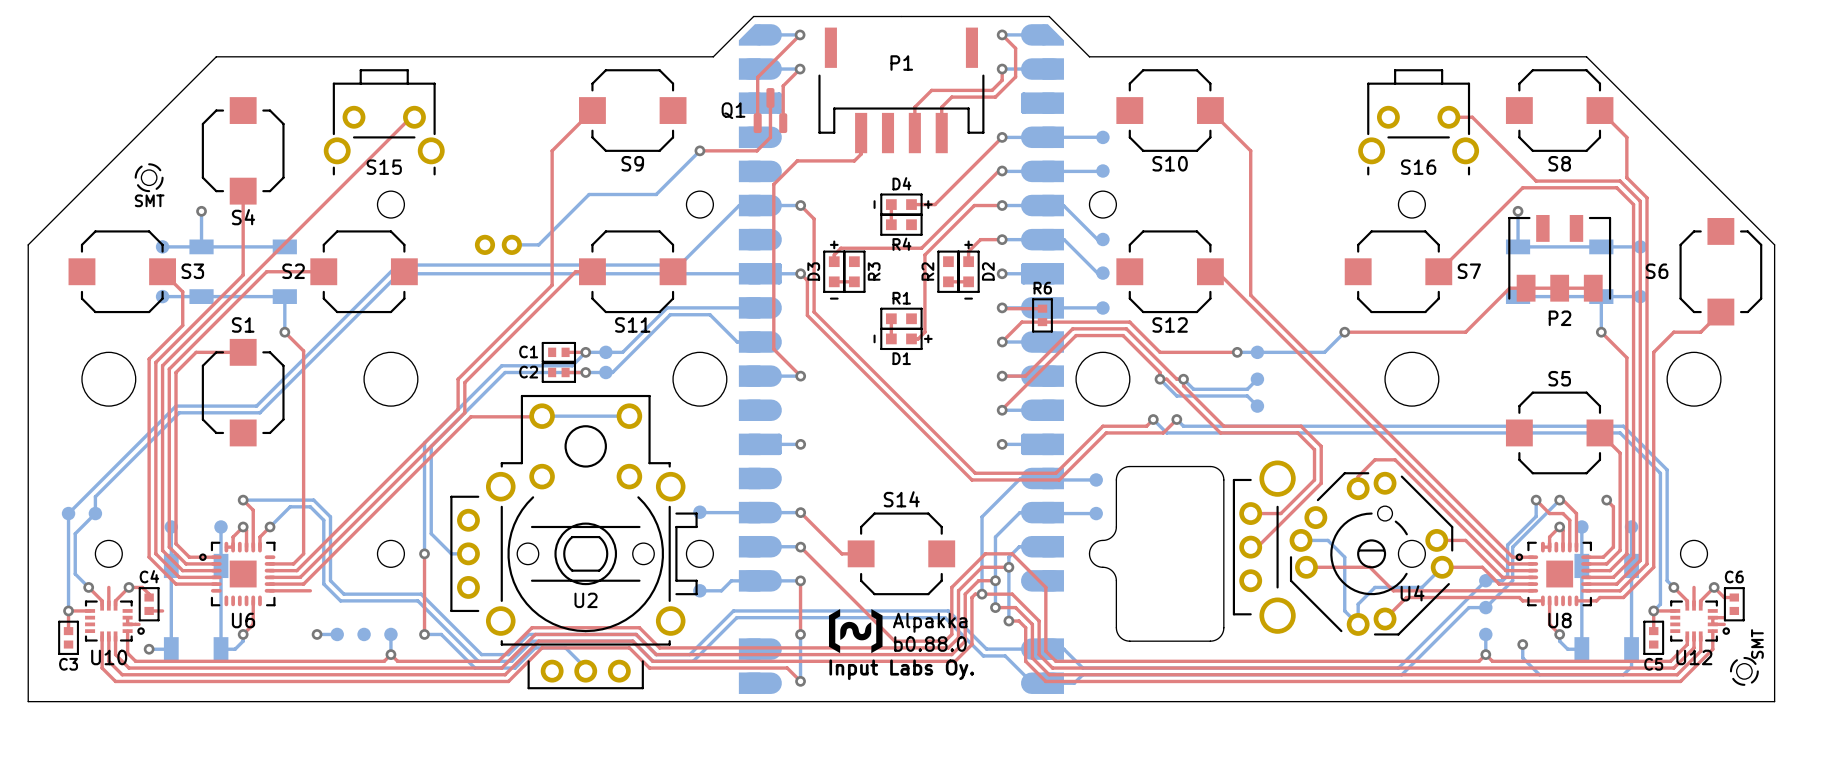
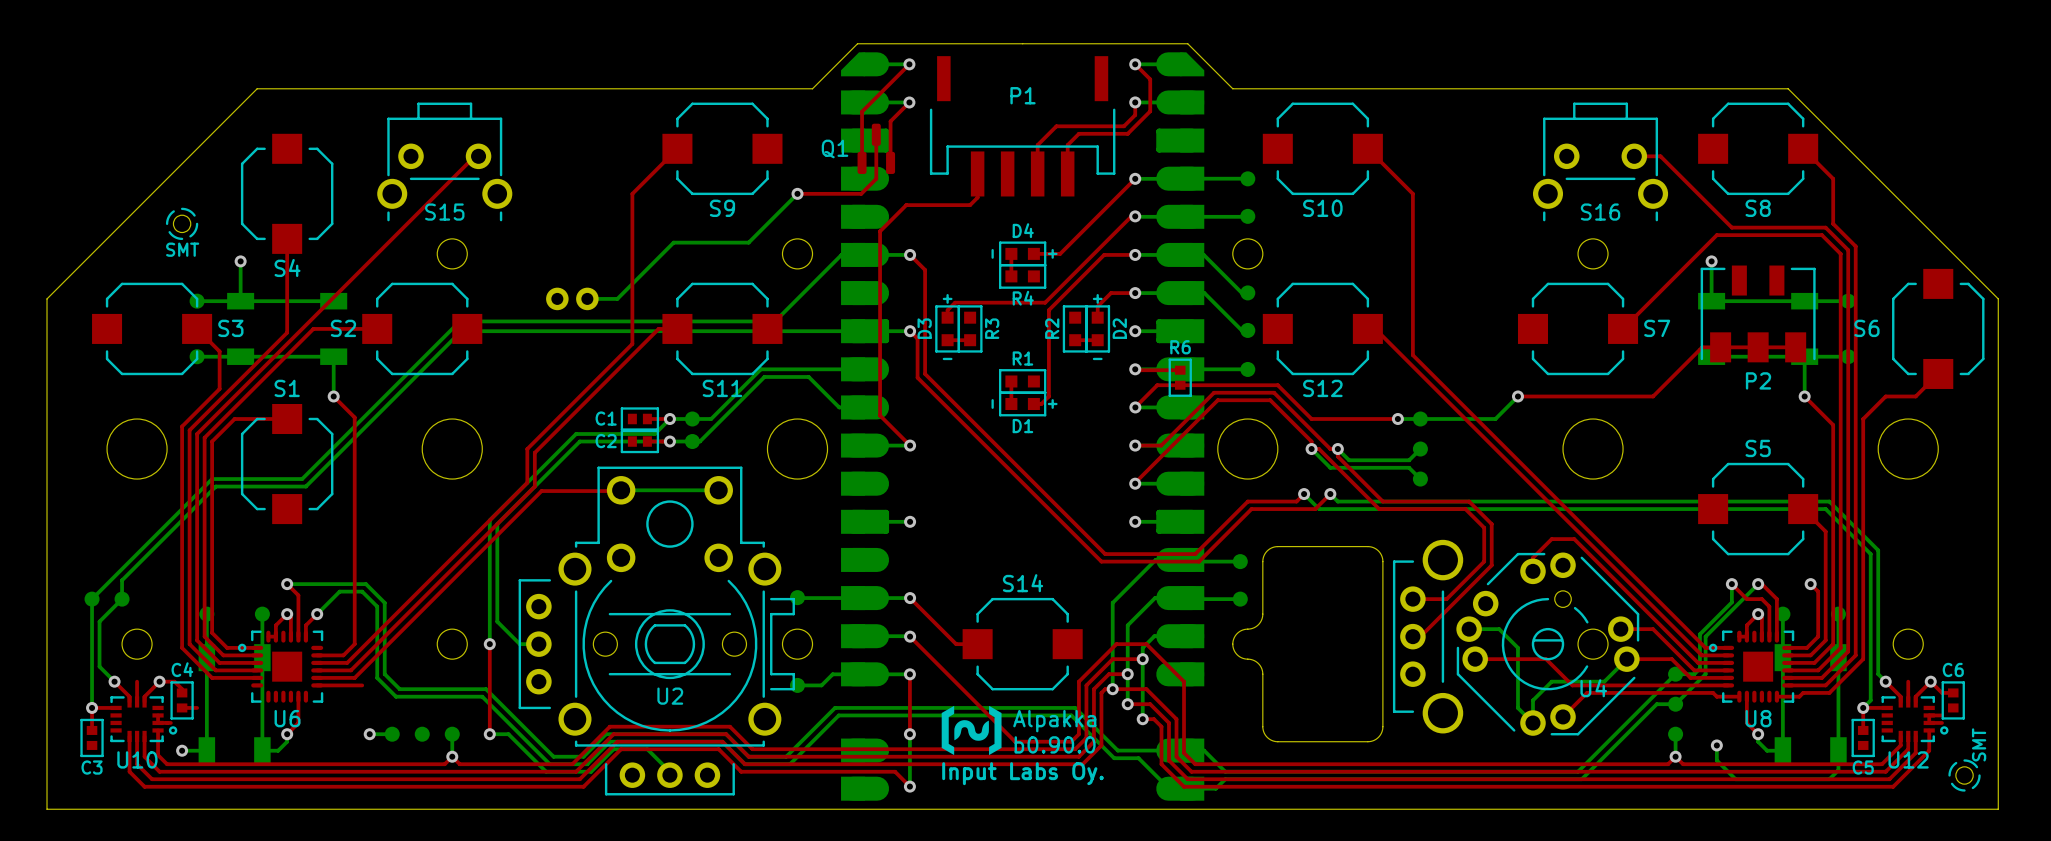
text: b0.88.0 (930, 644) -> b0.90.0 (1055, 744)

